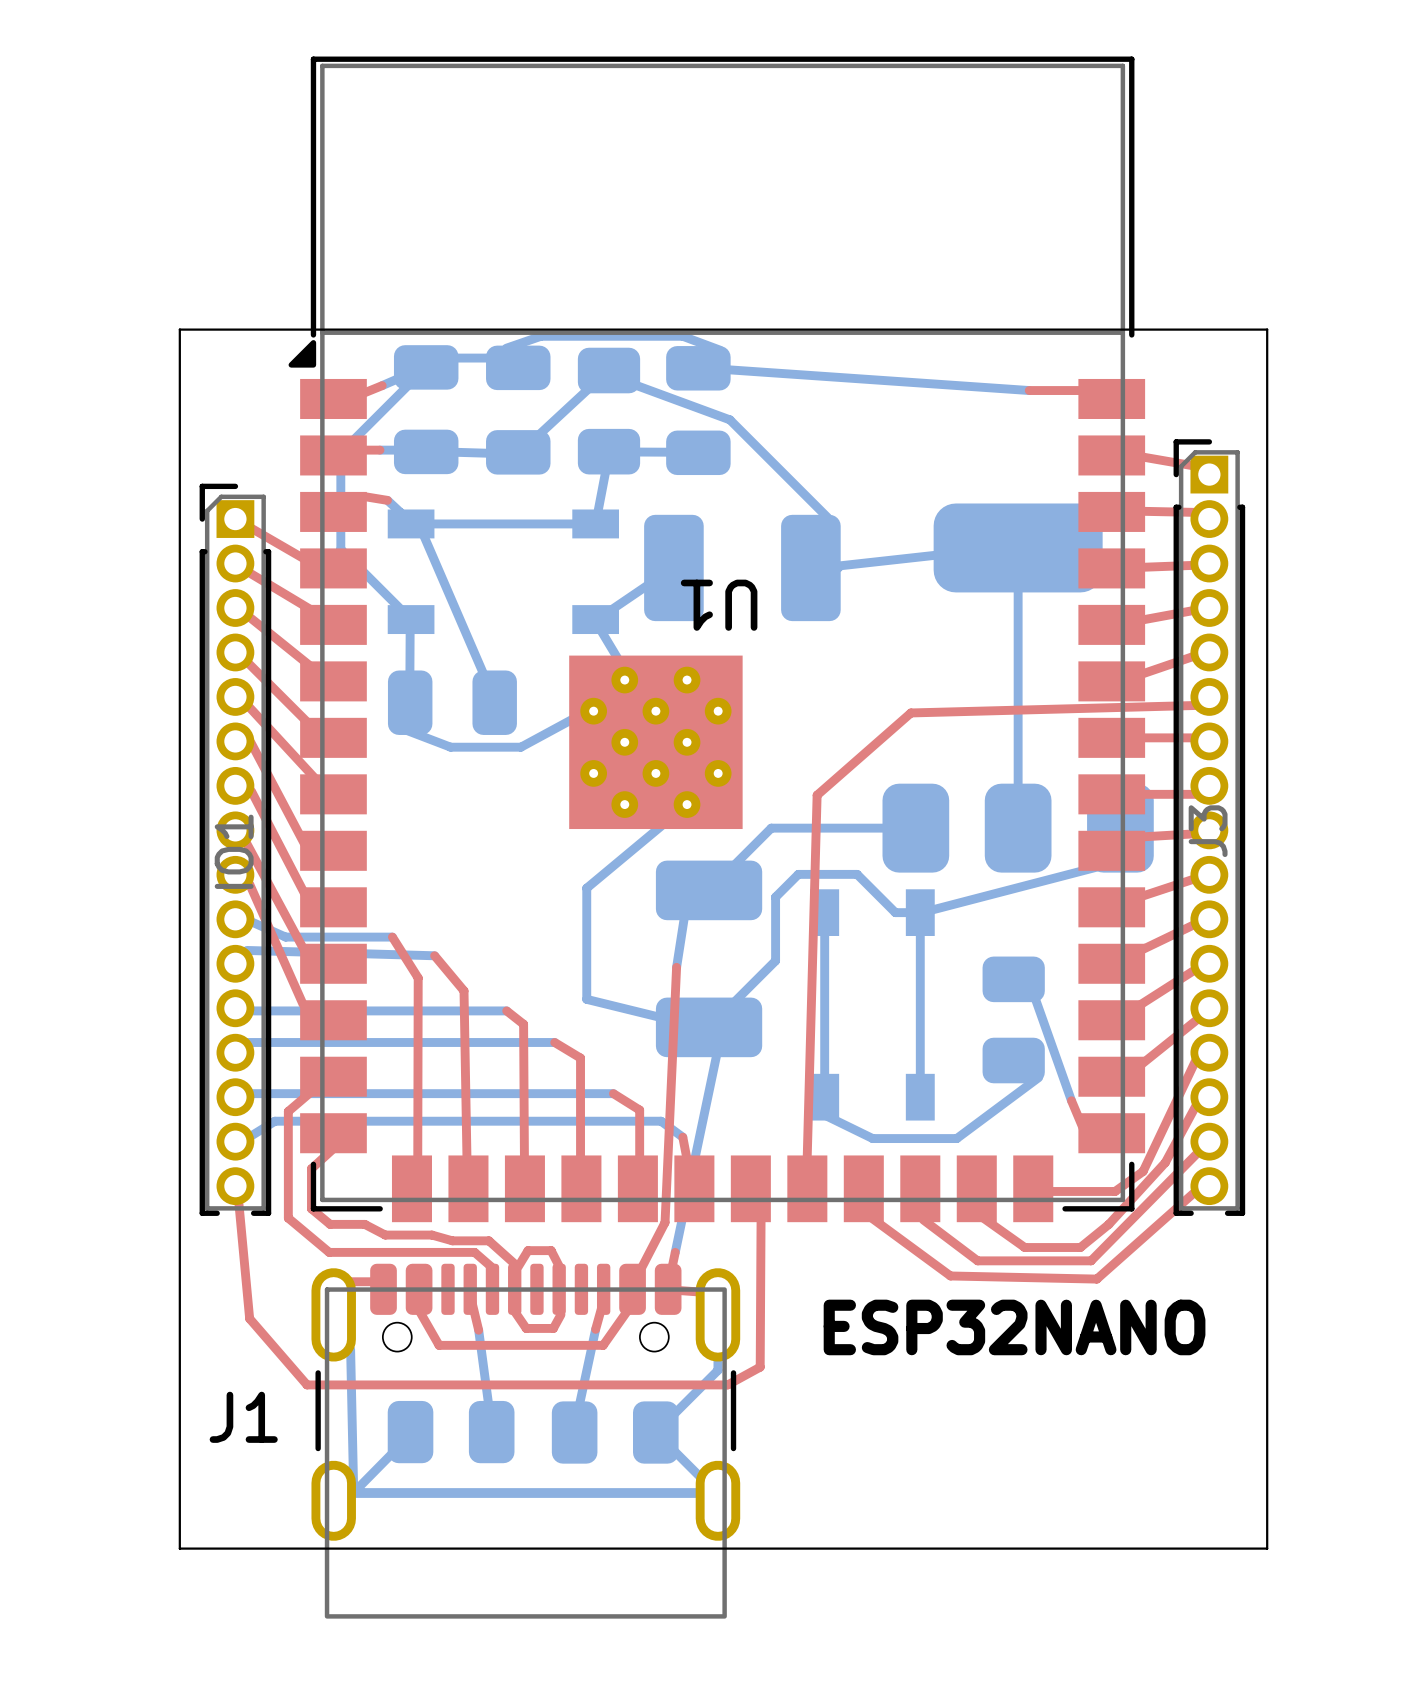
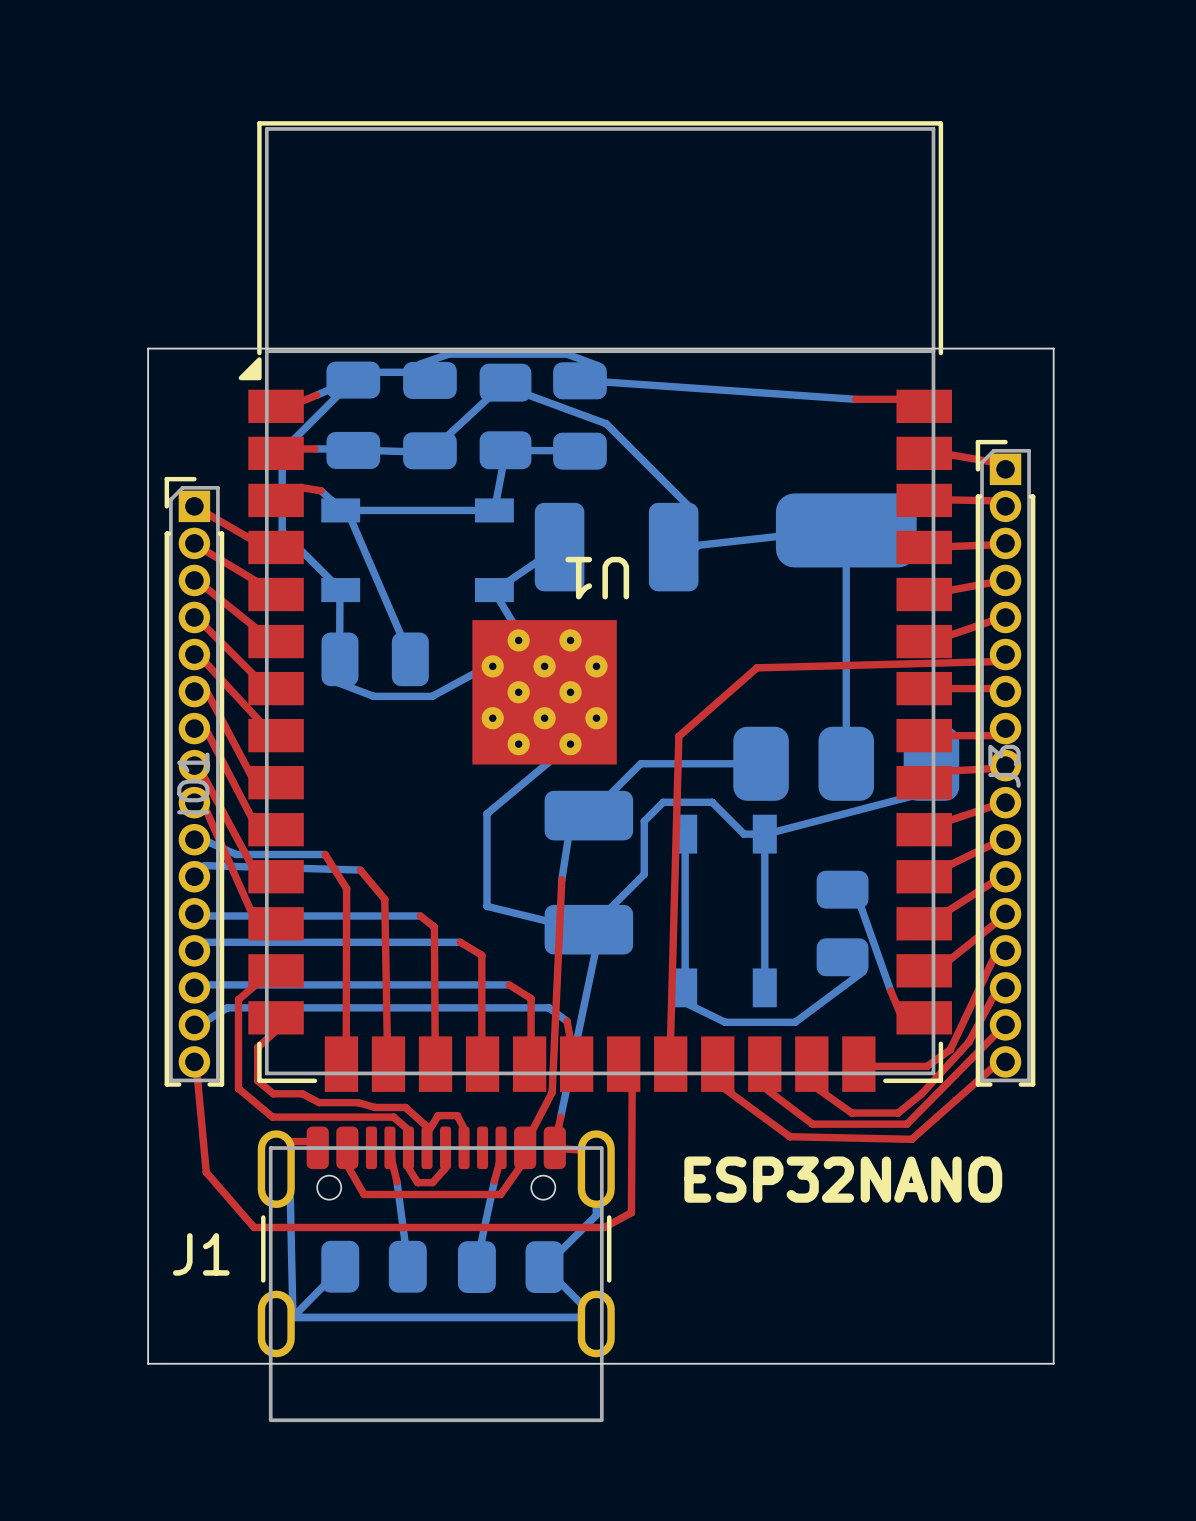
top track: (514, 1311) (526, 1328) (553, 1328) (560, 1314) -> none
top track: none -> (445, 1167) (432, 1182) (417, 1182) (408, 1168)

